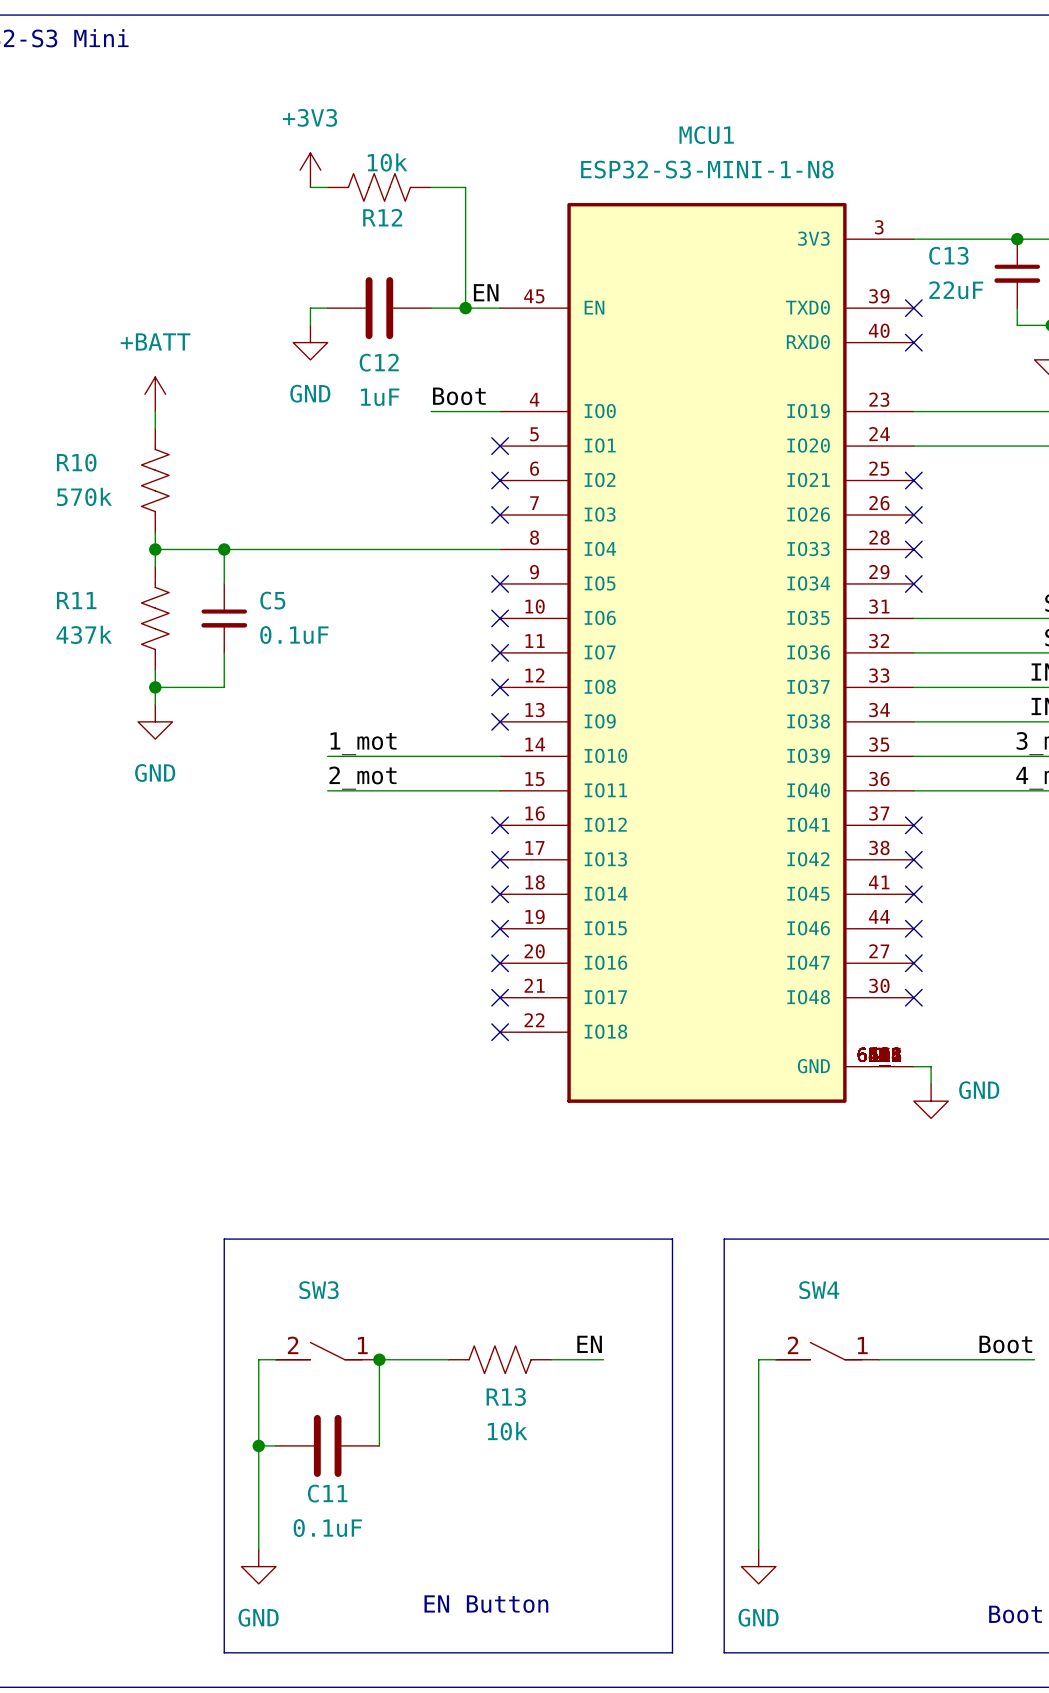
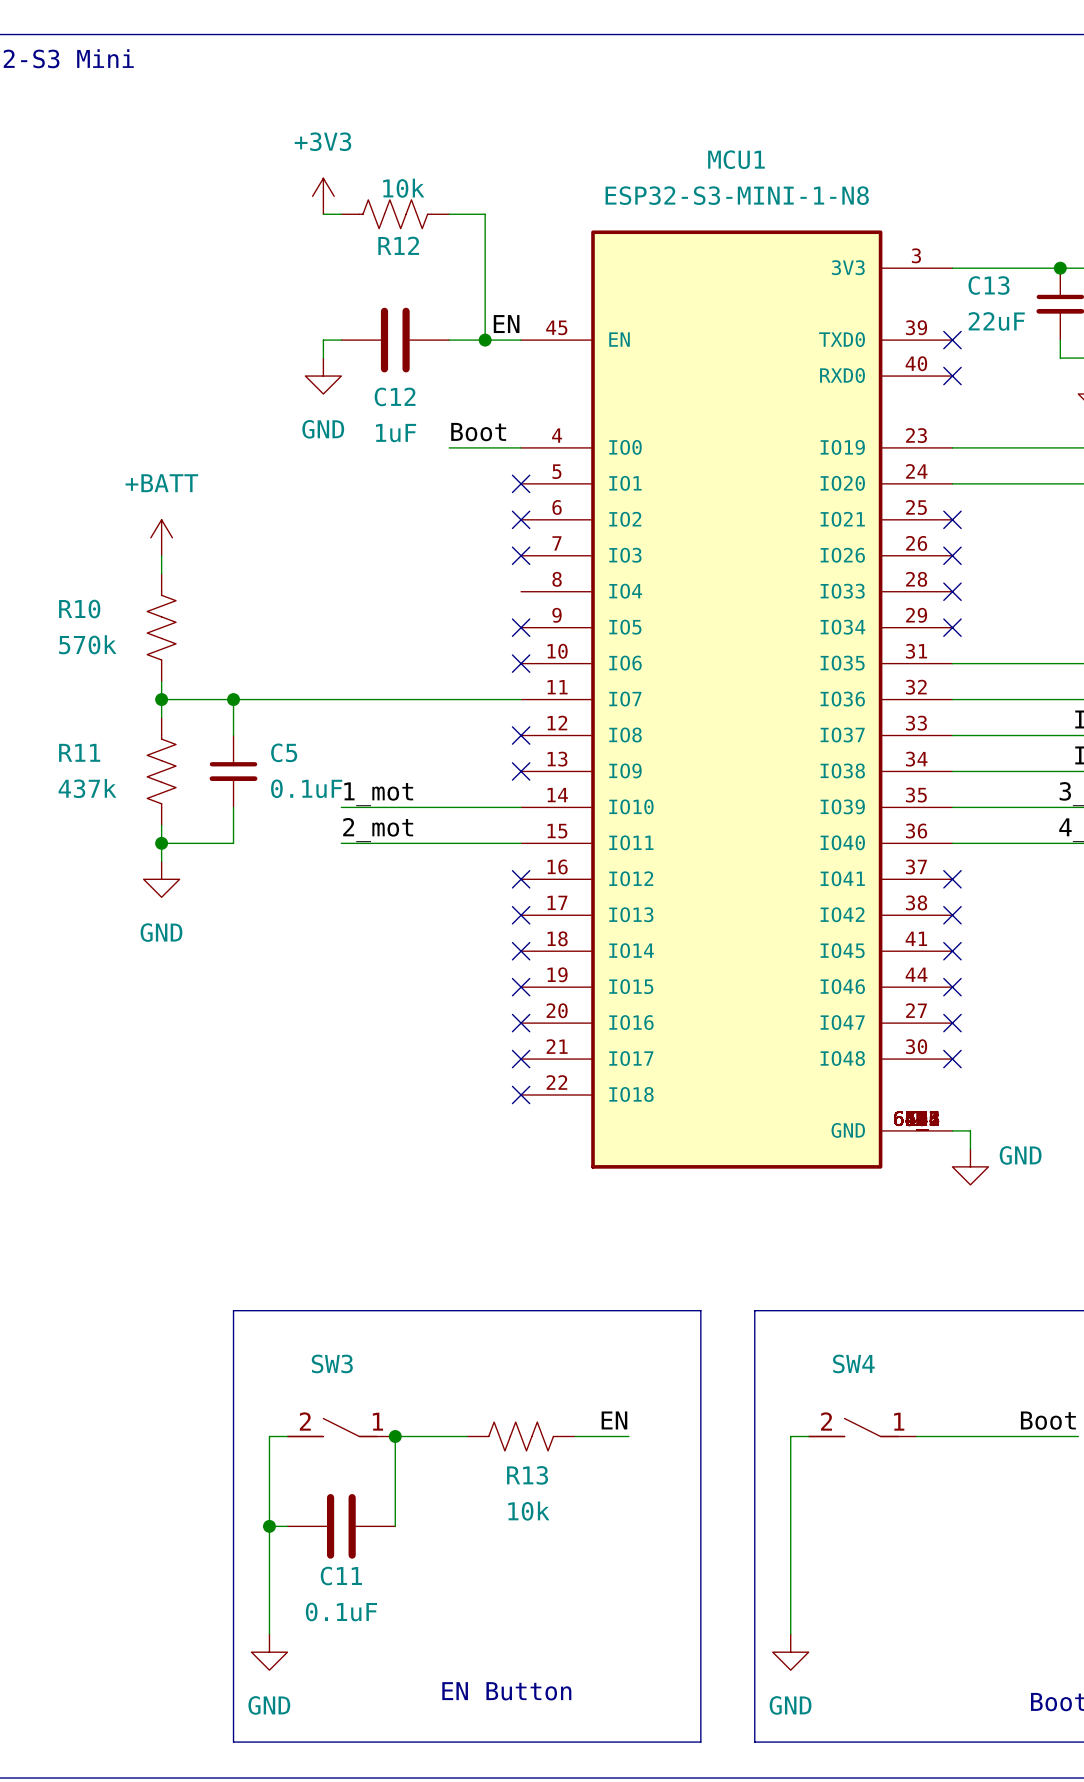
power symbol position: +BATT (155, 394) -> +BATT (161, 537)
wire: (155, 411) (155, 428) -> none
R10 position: (155, 480) -> (161, 627)
wire: (155, 549) (500, 549) -> (161, 699) (521, 699)
junction: (155, 549) -> none
wire: (224, 549) (224, 583) -> (161, 825) (161, 861)
junction: (224, 549) -> none
R11 position: (155, 618) -> (161, 771)
C5 position: (224, 618) -> (233, 771)
junction: none -> (233, 699)
no-connect mark: (500, 652) -> none
wire: (155, 687) (224, 687) -> none
junction position: (155, 687) -> (161, 699)
power symbol position: GND (155, 721) -> GND (161, 879)
wire: none -> (233, 807) (233, 843) (161, 843)
junction: none -> (161, 843)

